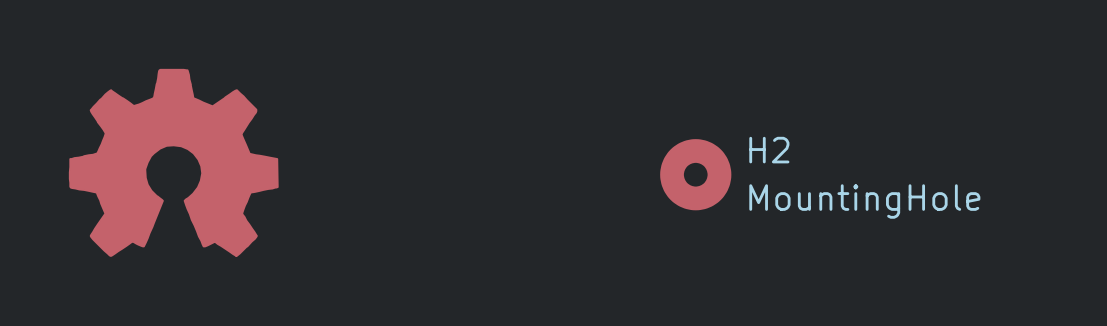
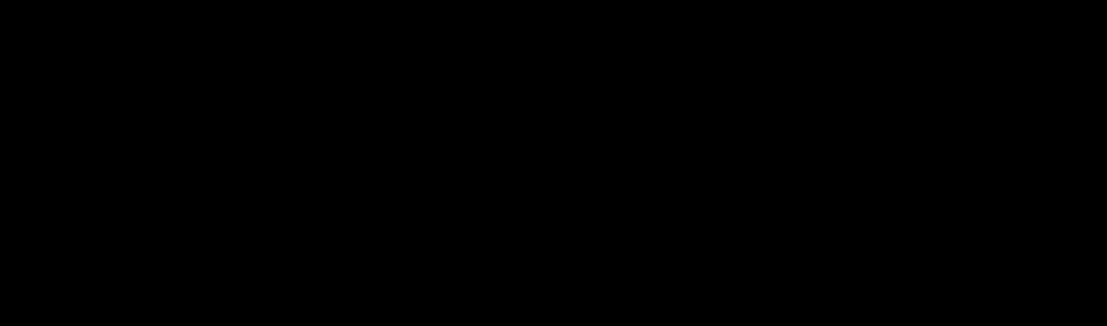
power symbol: (173, 162) -> none
H2: MountingHole (695, 174) -> none

